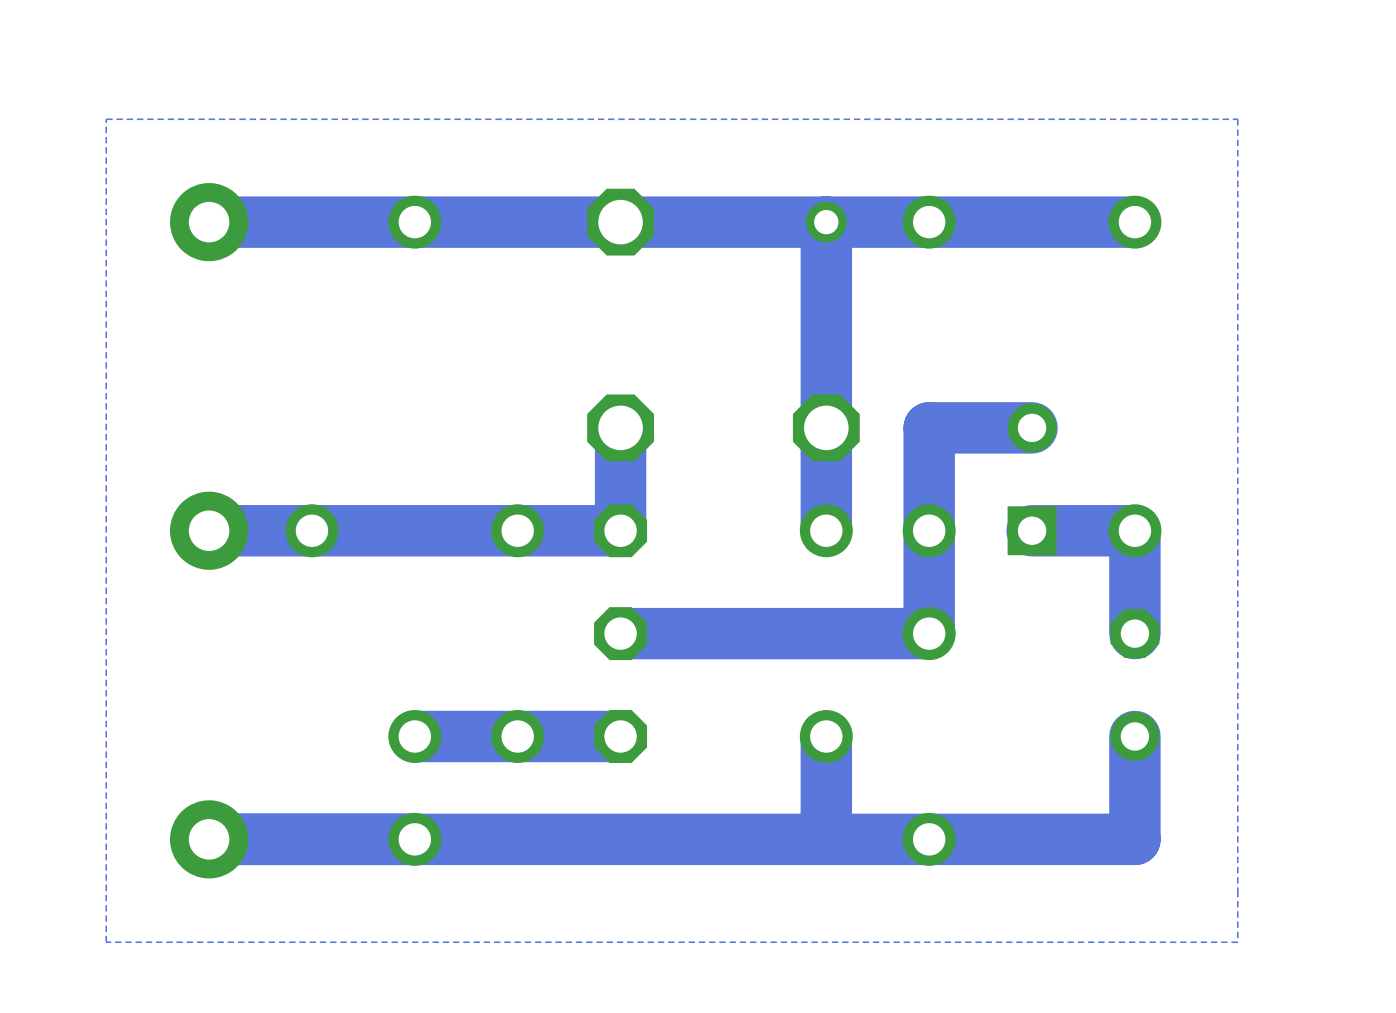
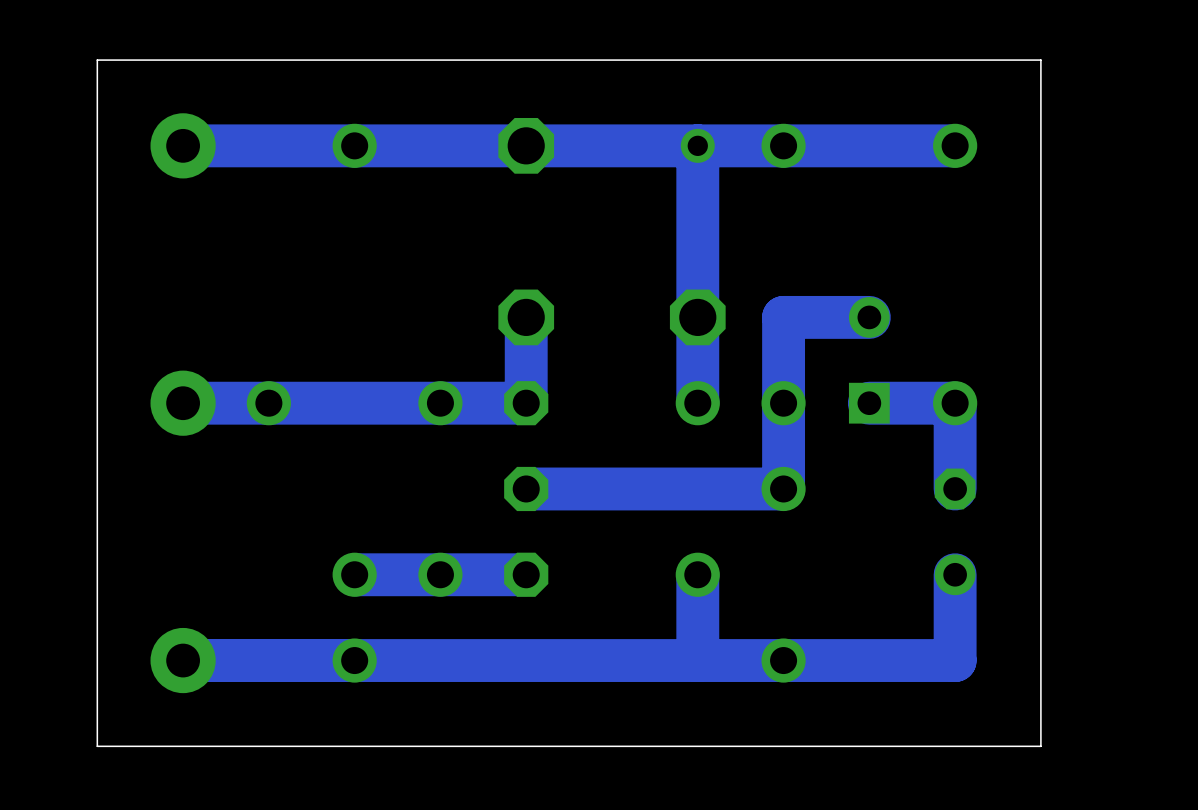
zone outline: (1237, 119) (106, 119) (106, 942) (1237, 942) (1237, 119) -> none
board edge: none -> (1040, 60) (1040, 746) (97, 746) (97, 60) (1040, 60)

